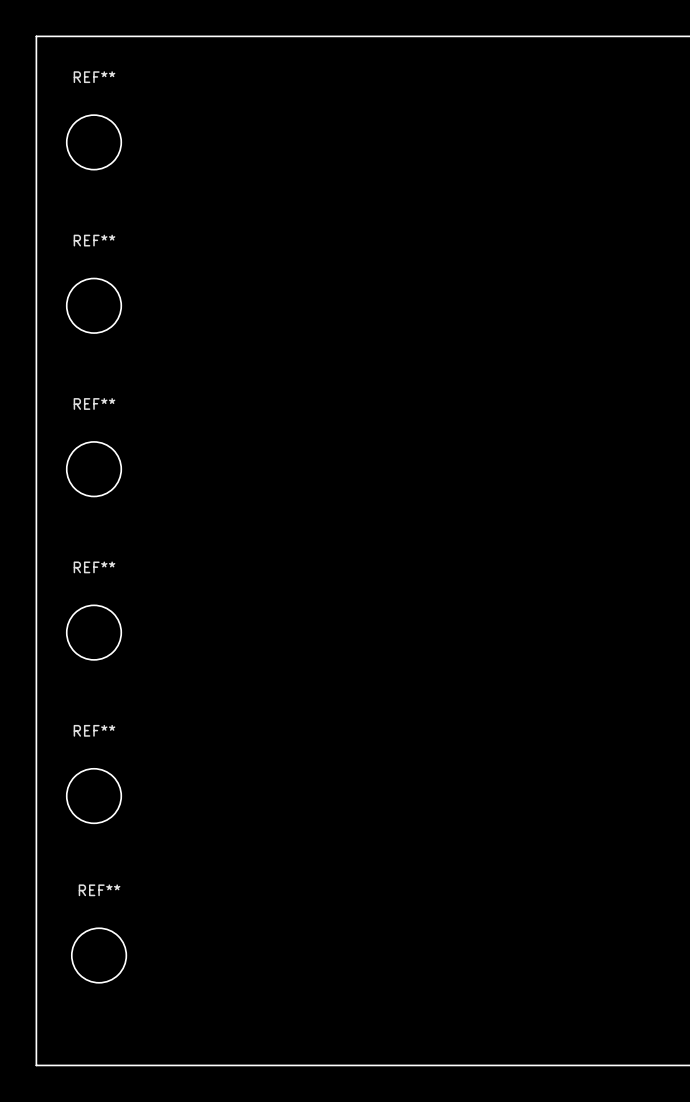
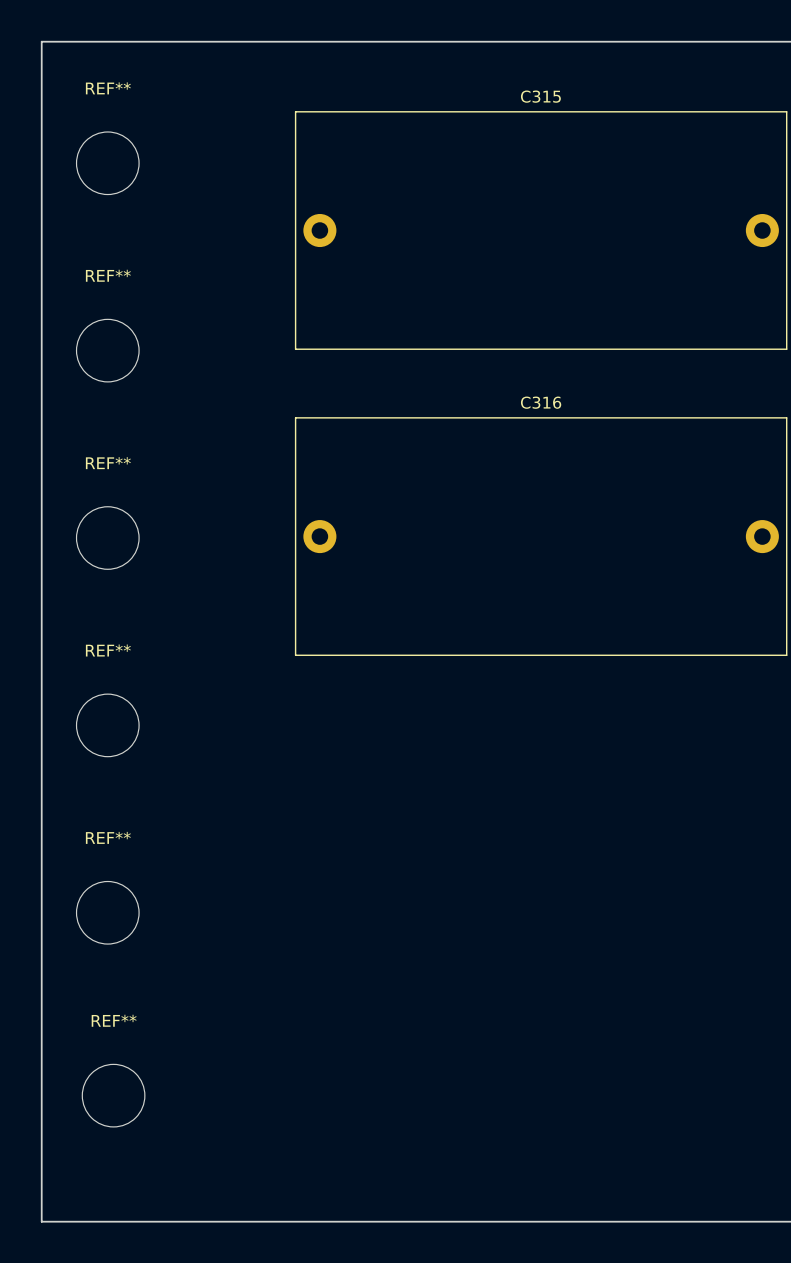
C315: none -> (541, 230)
C316: none -> (541, 536)

